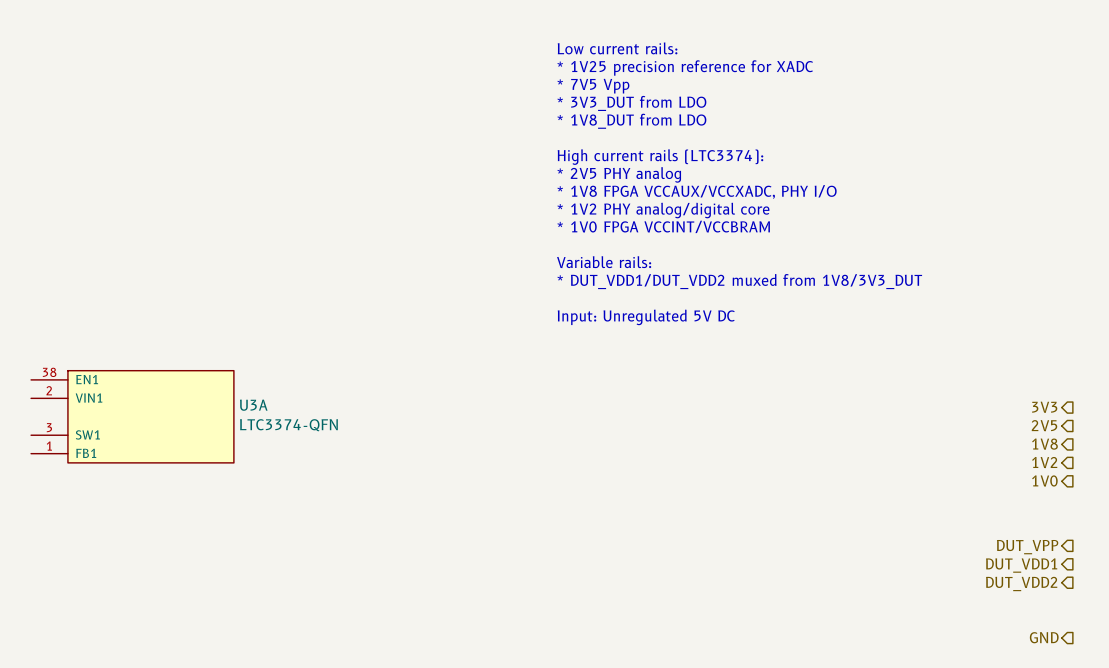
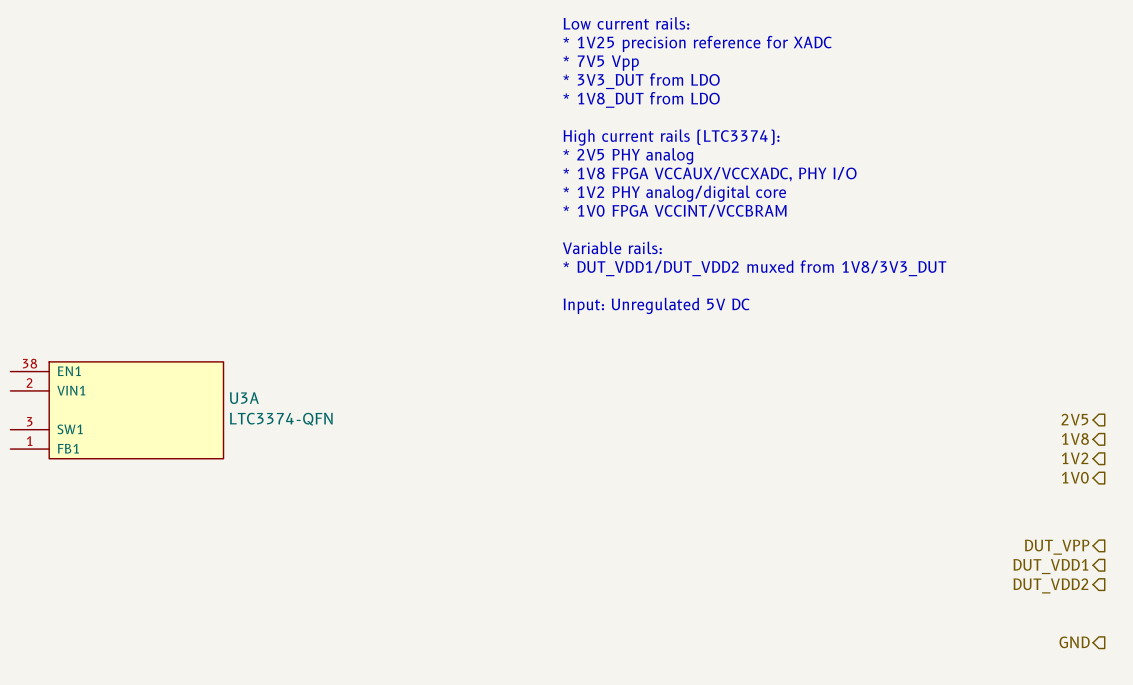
hierarchical label: 3V3 (1044, 407) -> none

